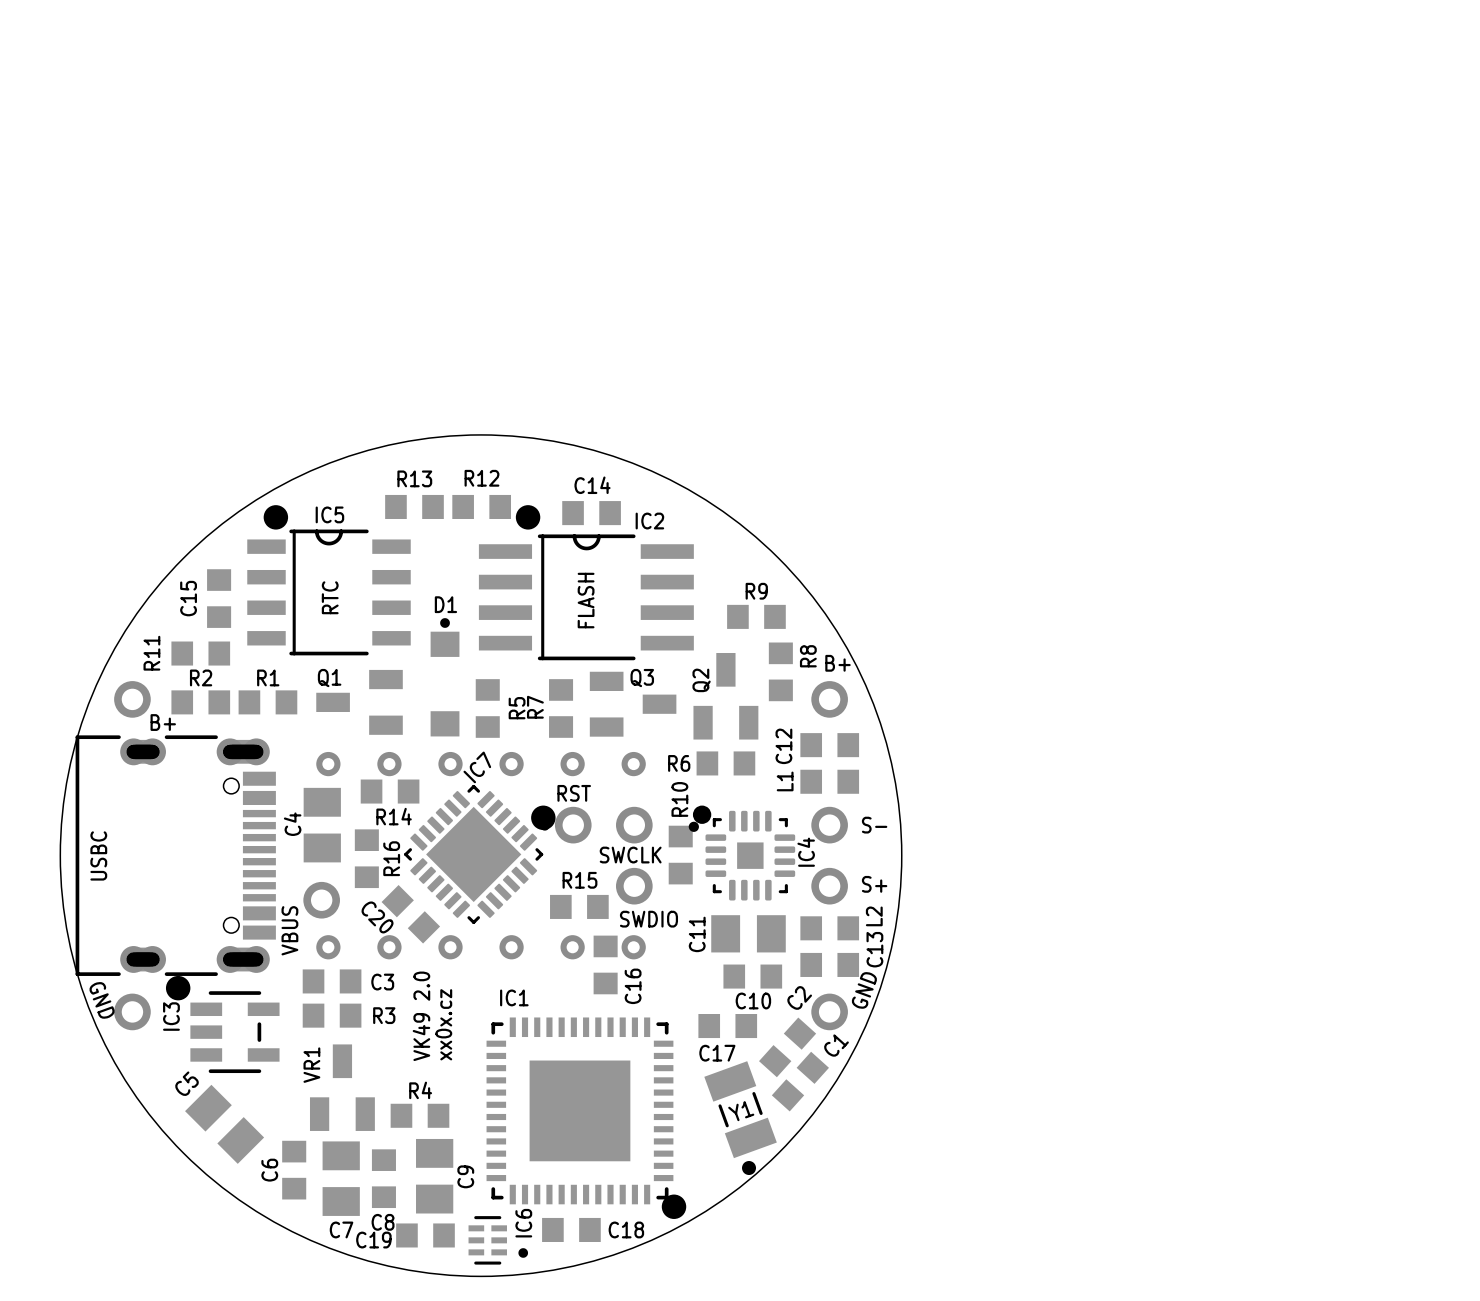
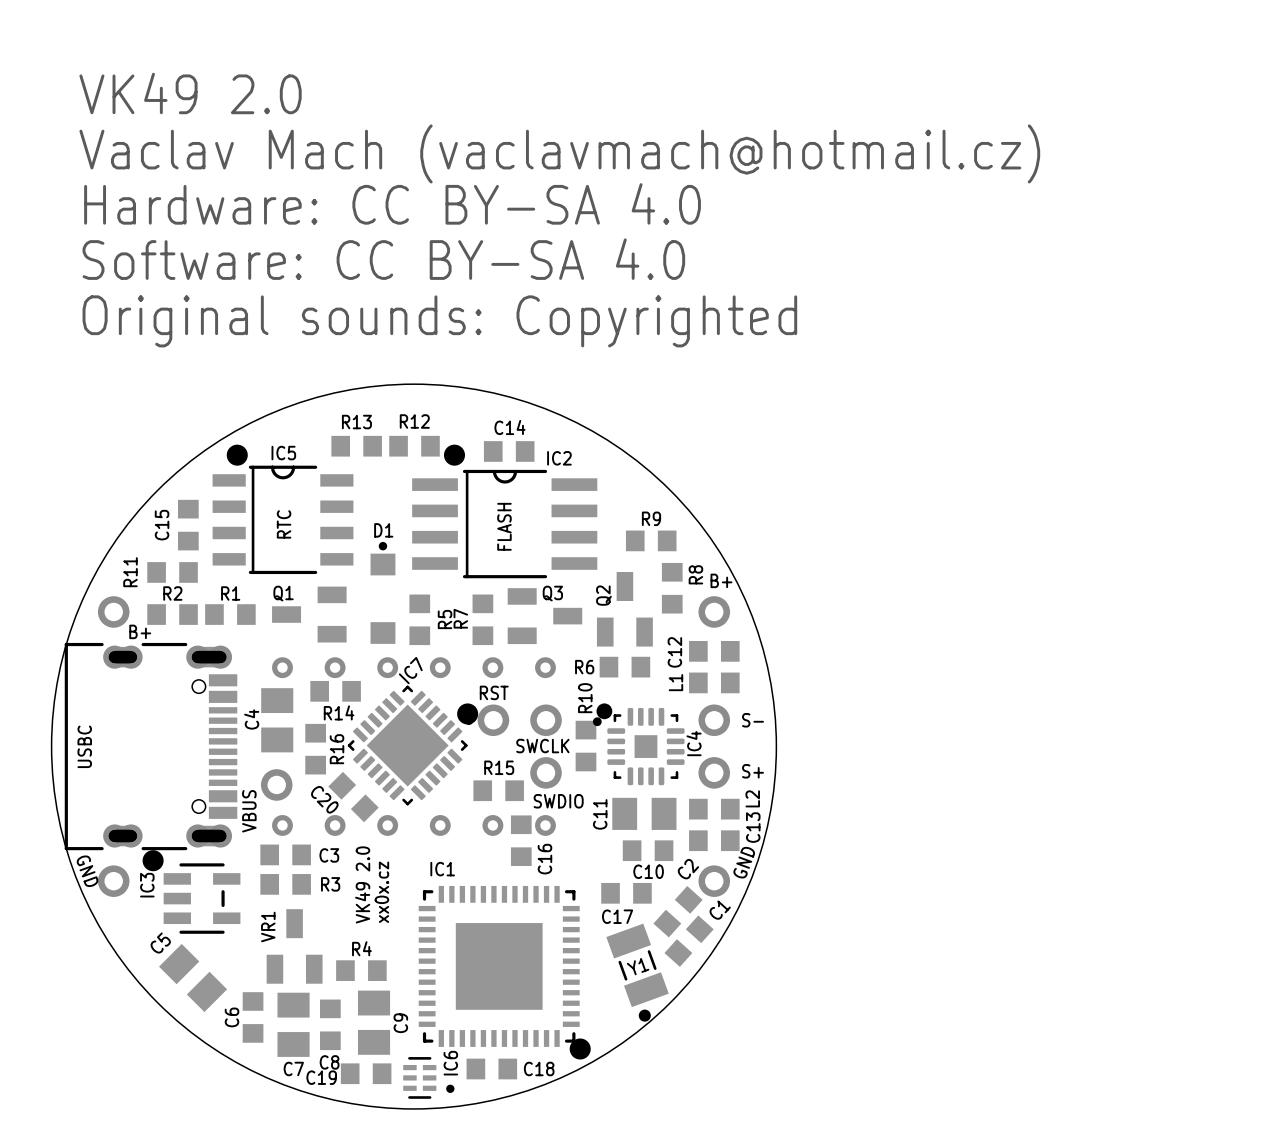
text: none -> VK49 2.0 (190, 93)
text: none -> Vaclav Mach (vaclavmach@hotmail.cz) (559, 153)
text: none -> Hardware: CC BY-SA 4.0 (392, 203)
text: none -> Software: CC BY-SA 4.0 (383, 259)
text: none -> Original sounds: Copyrighted (439, 321)

